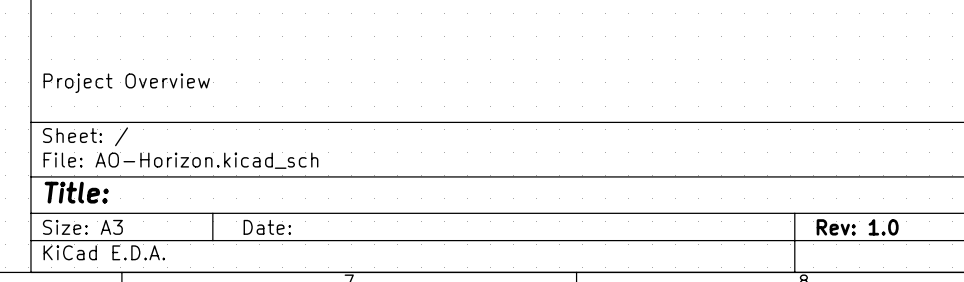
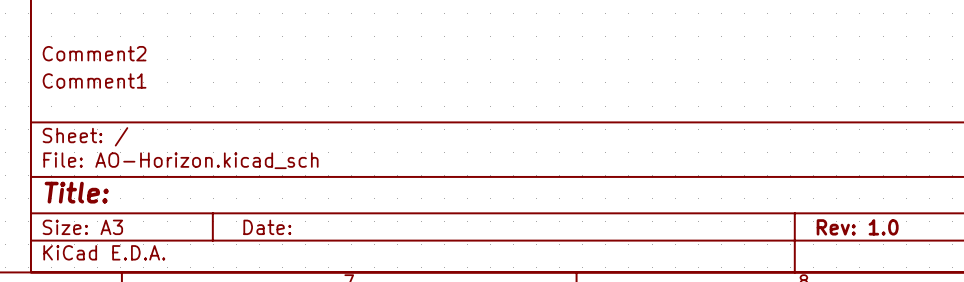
title block: none -> Comment2 (94, 53)
title block: Project Overview (126, 83) -> Comment1 (94, 80)

